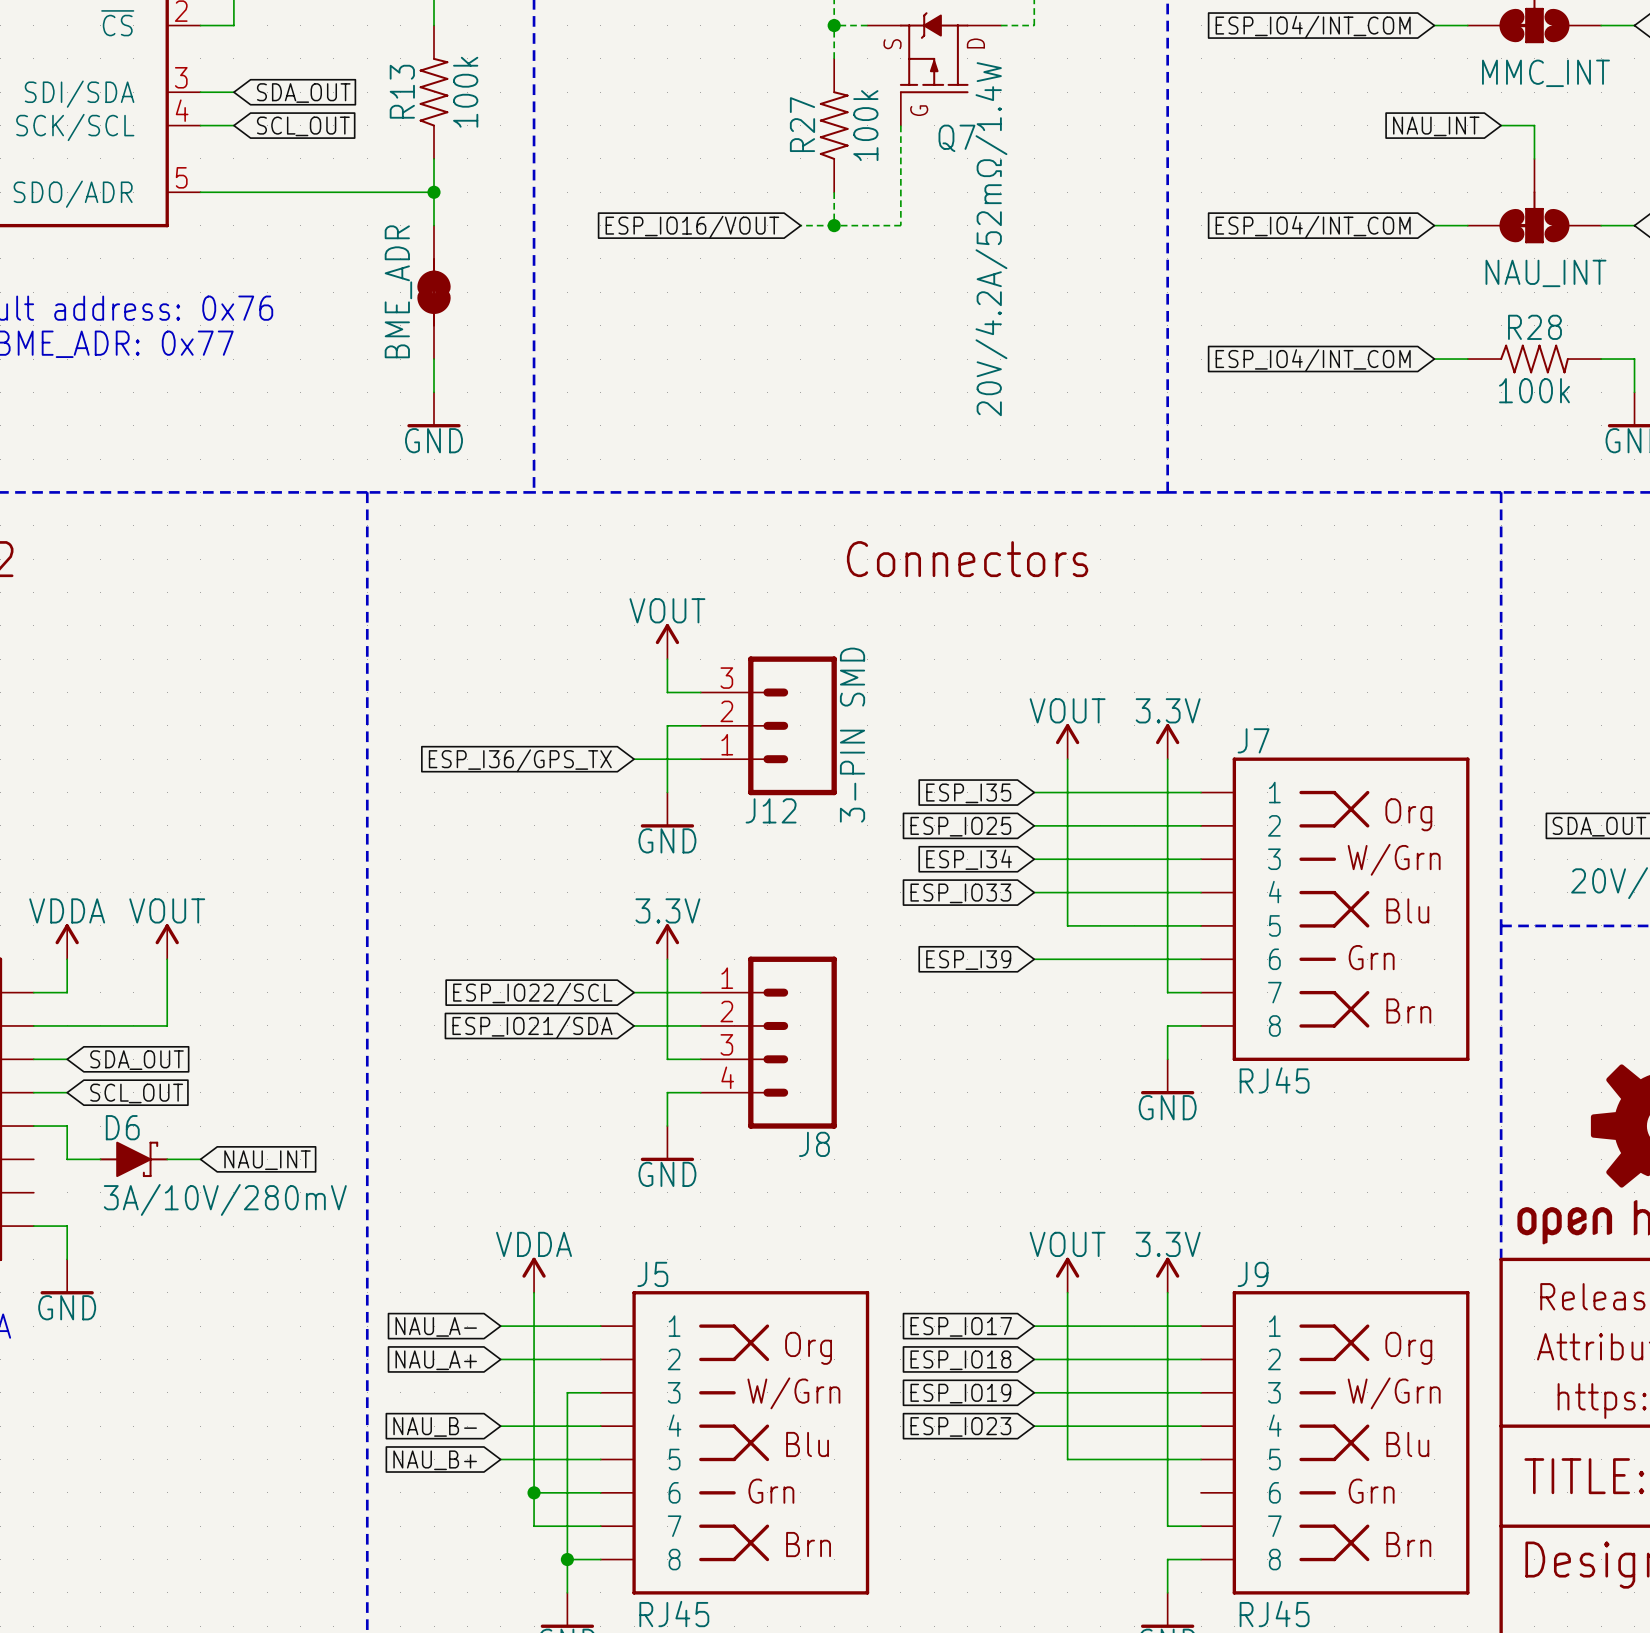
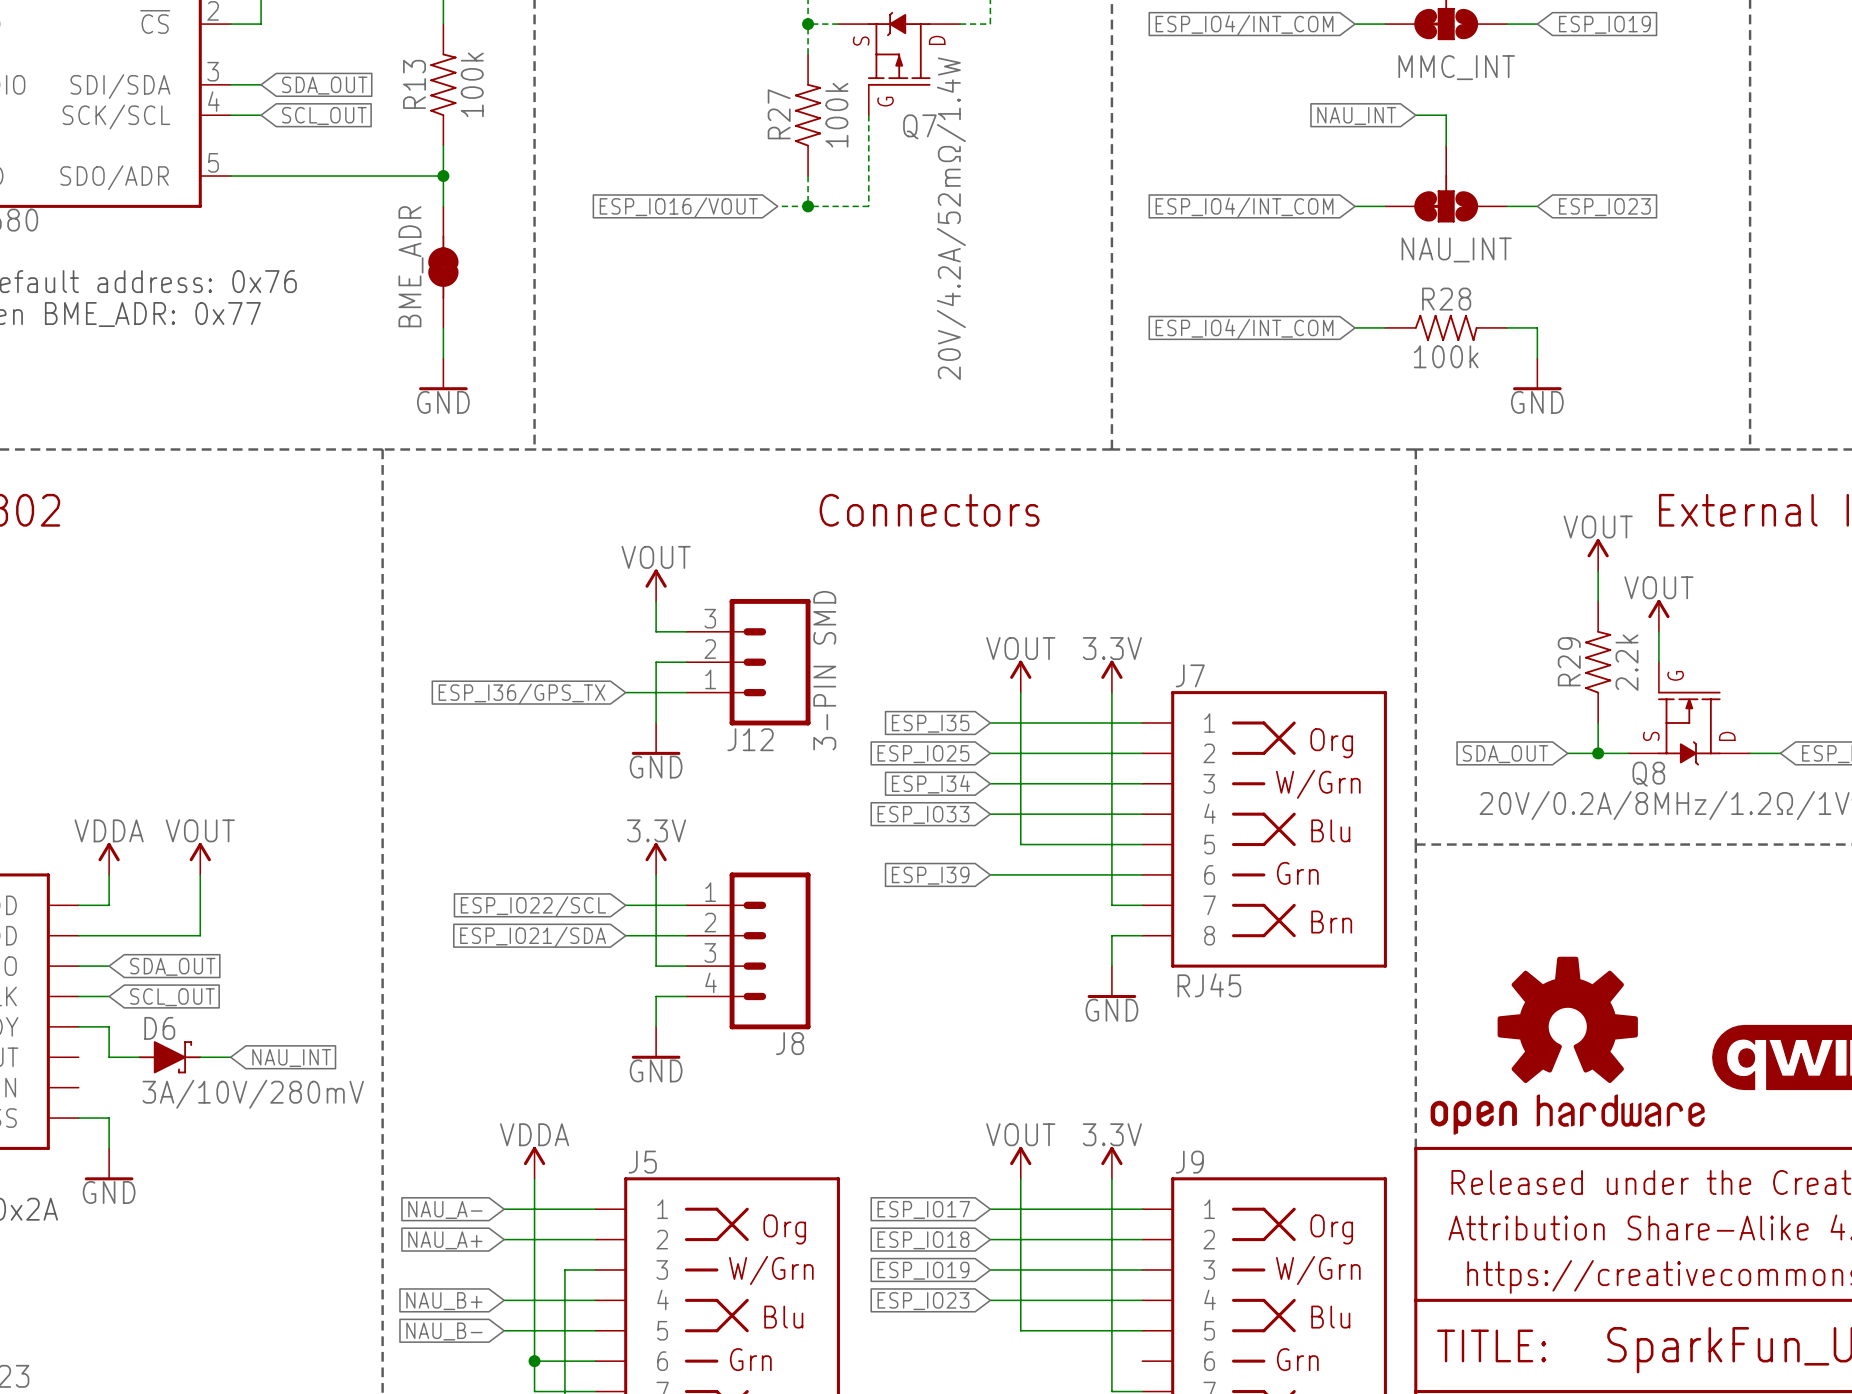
global label: NAU_B- (435, 1426) -> NAU_B+ (444, 1301)
global label: NAU_B+ (435, 1460) -> NAU_B- (444, 1331)

